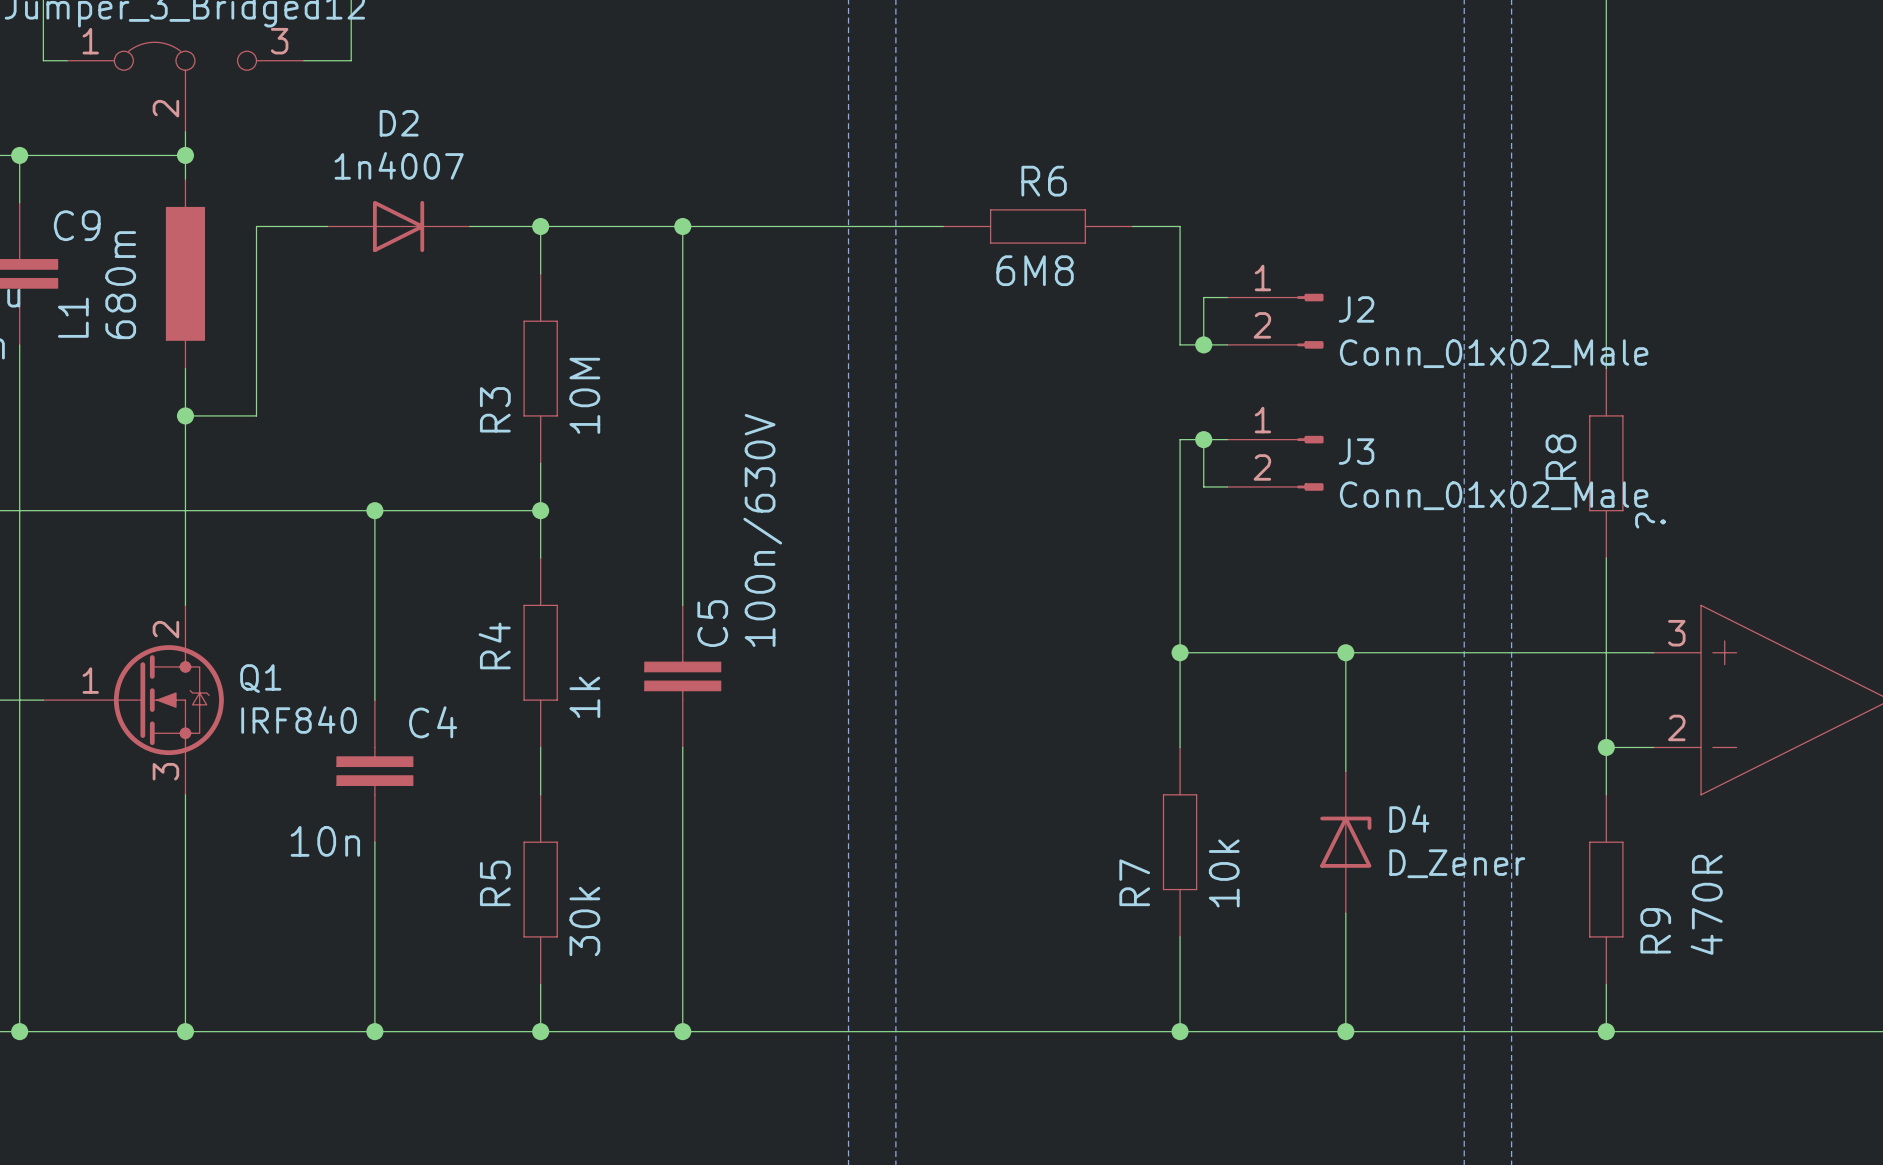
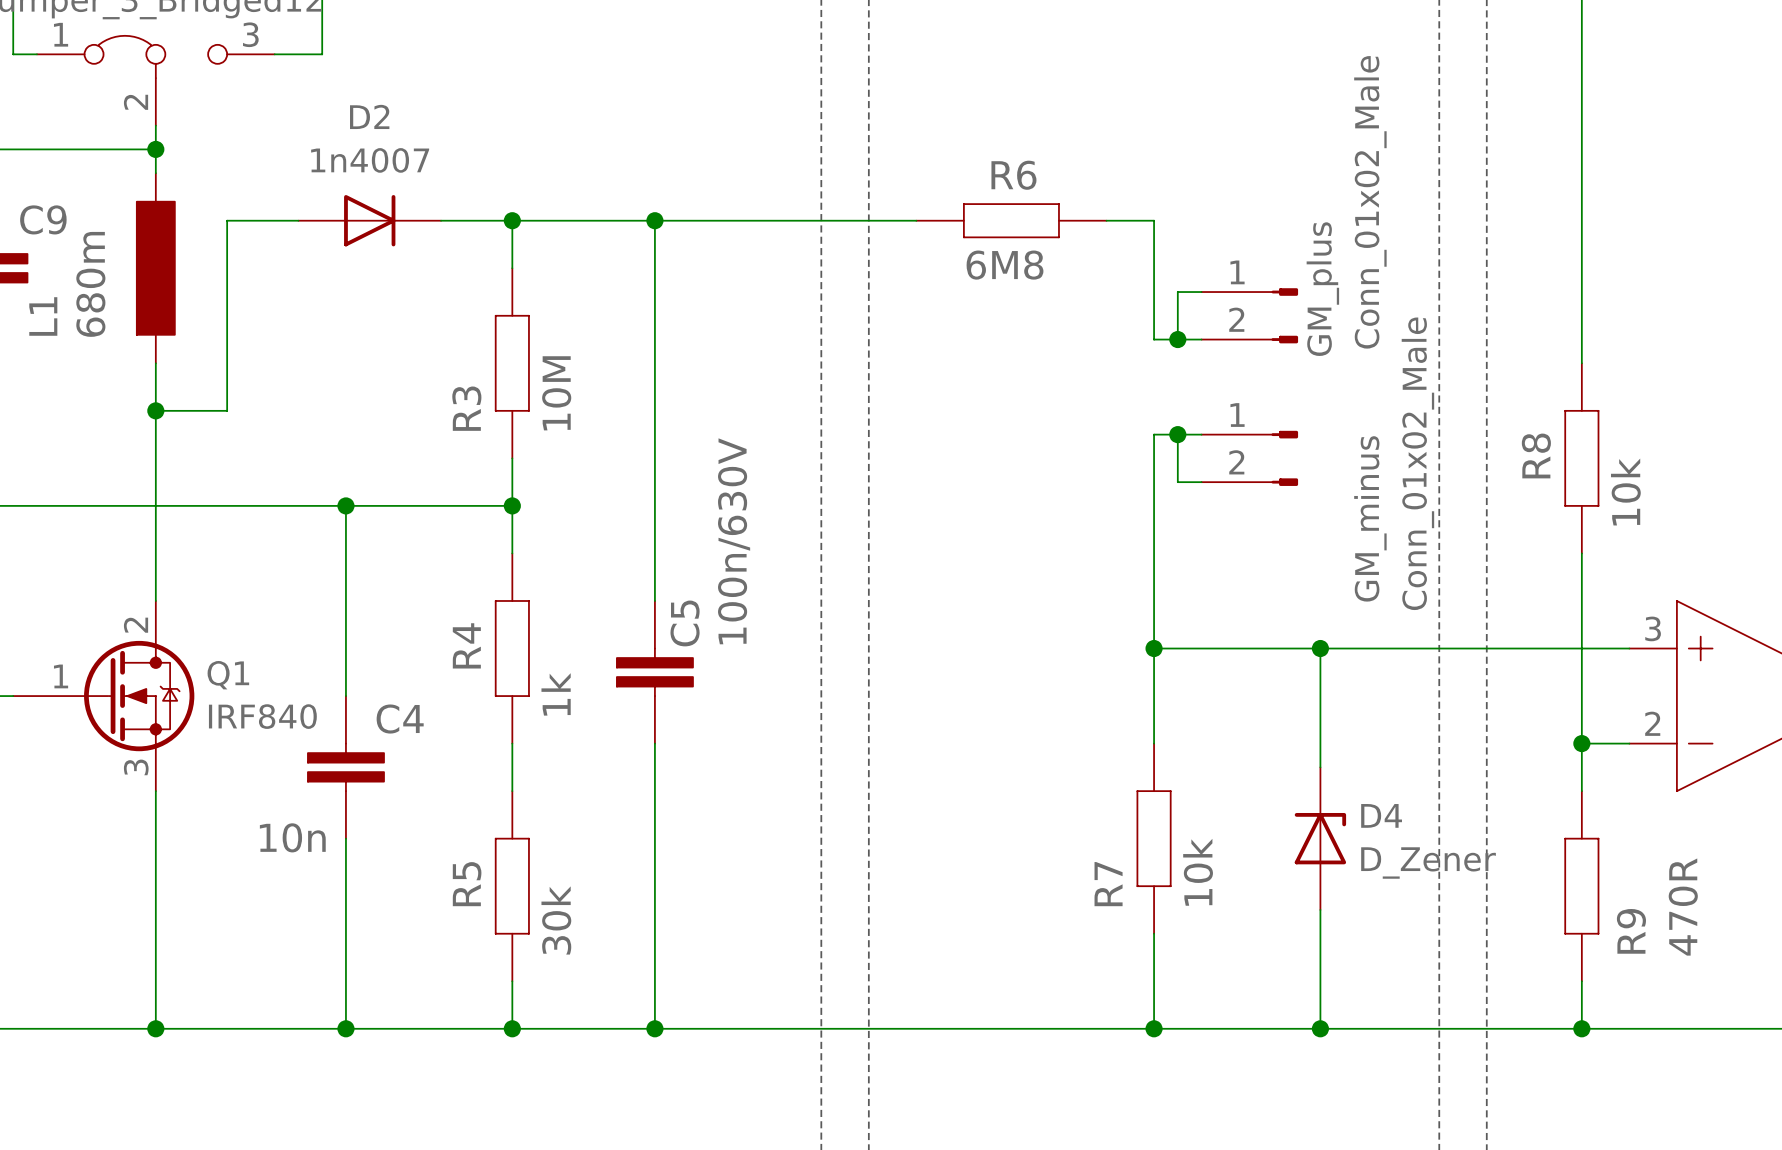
J2 name: J2 (1356, 309) -> GM_plus (1322, 289)
J2 value rotation: 0° (1494, 353) -> 90° counterclockwise (1370, 202)
J3 name: J3 (1356, 451) -> GM_minus (1370, 518)
J3 value rotation: 0° (1494, 495) -> 90° counterclockwise (1417, 463)
R8 value: ? (1650, 520) -> 10k (1625, 492)

